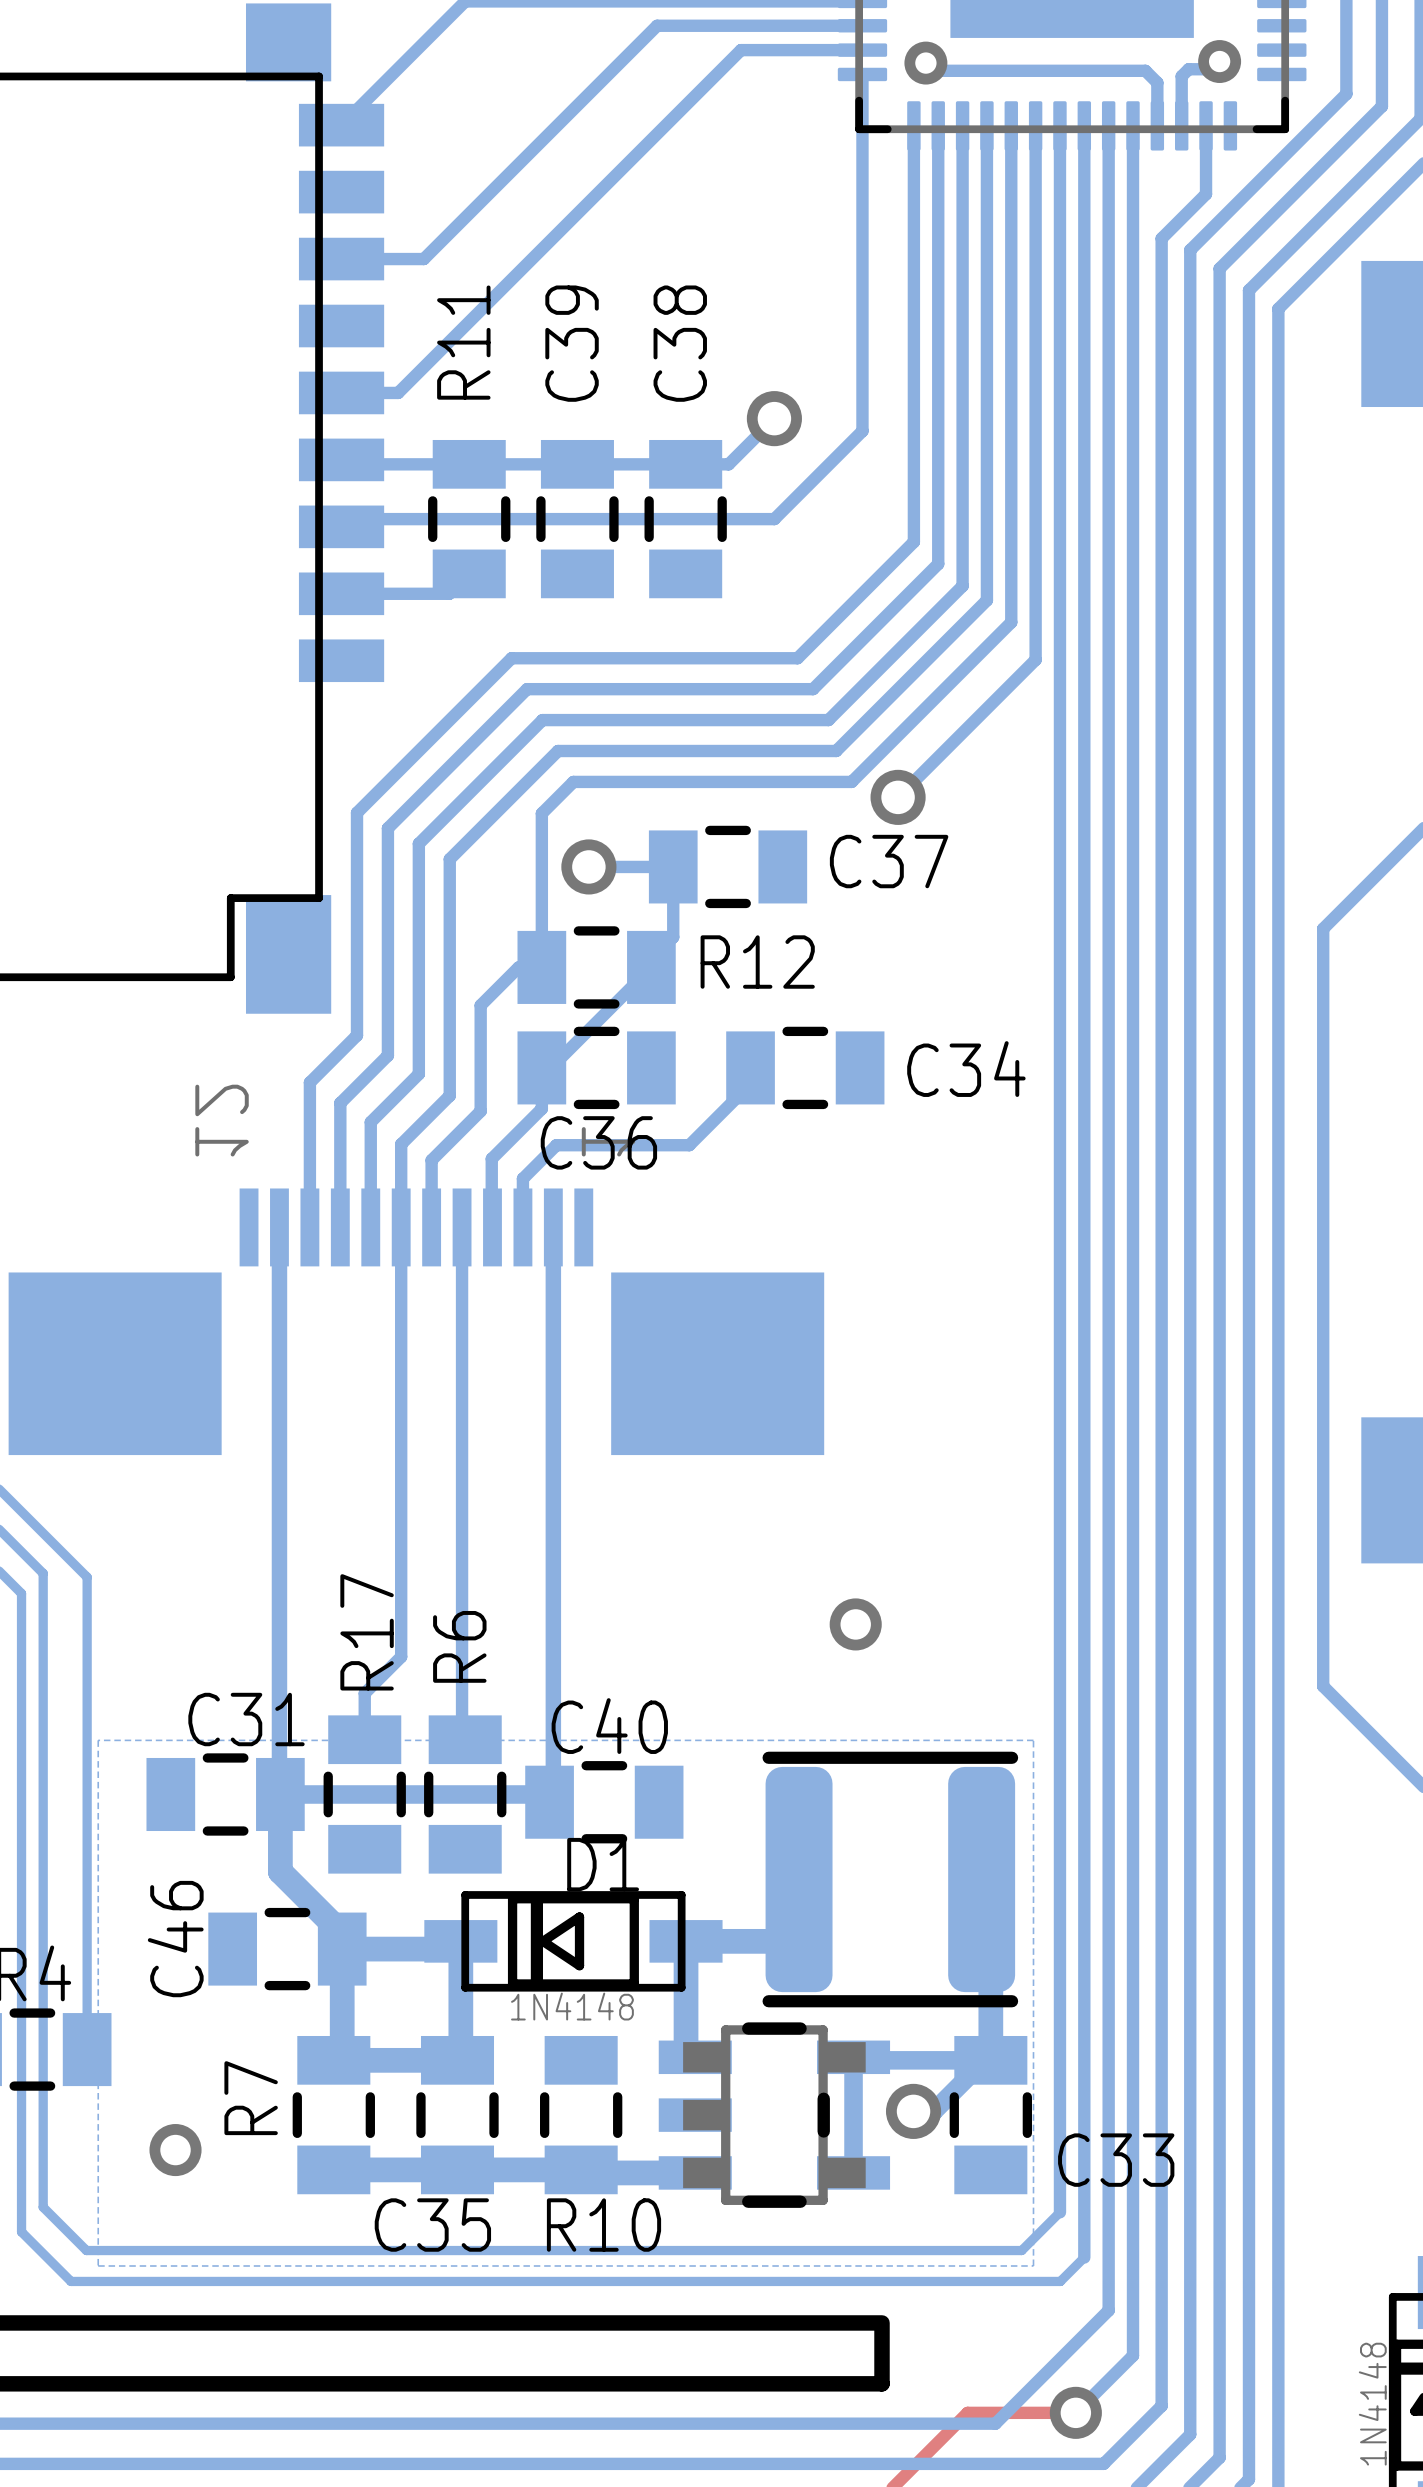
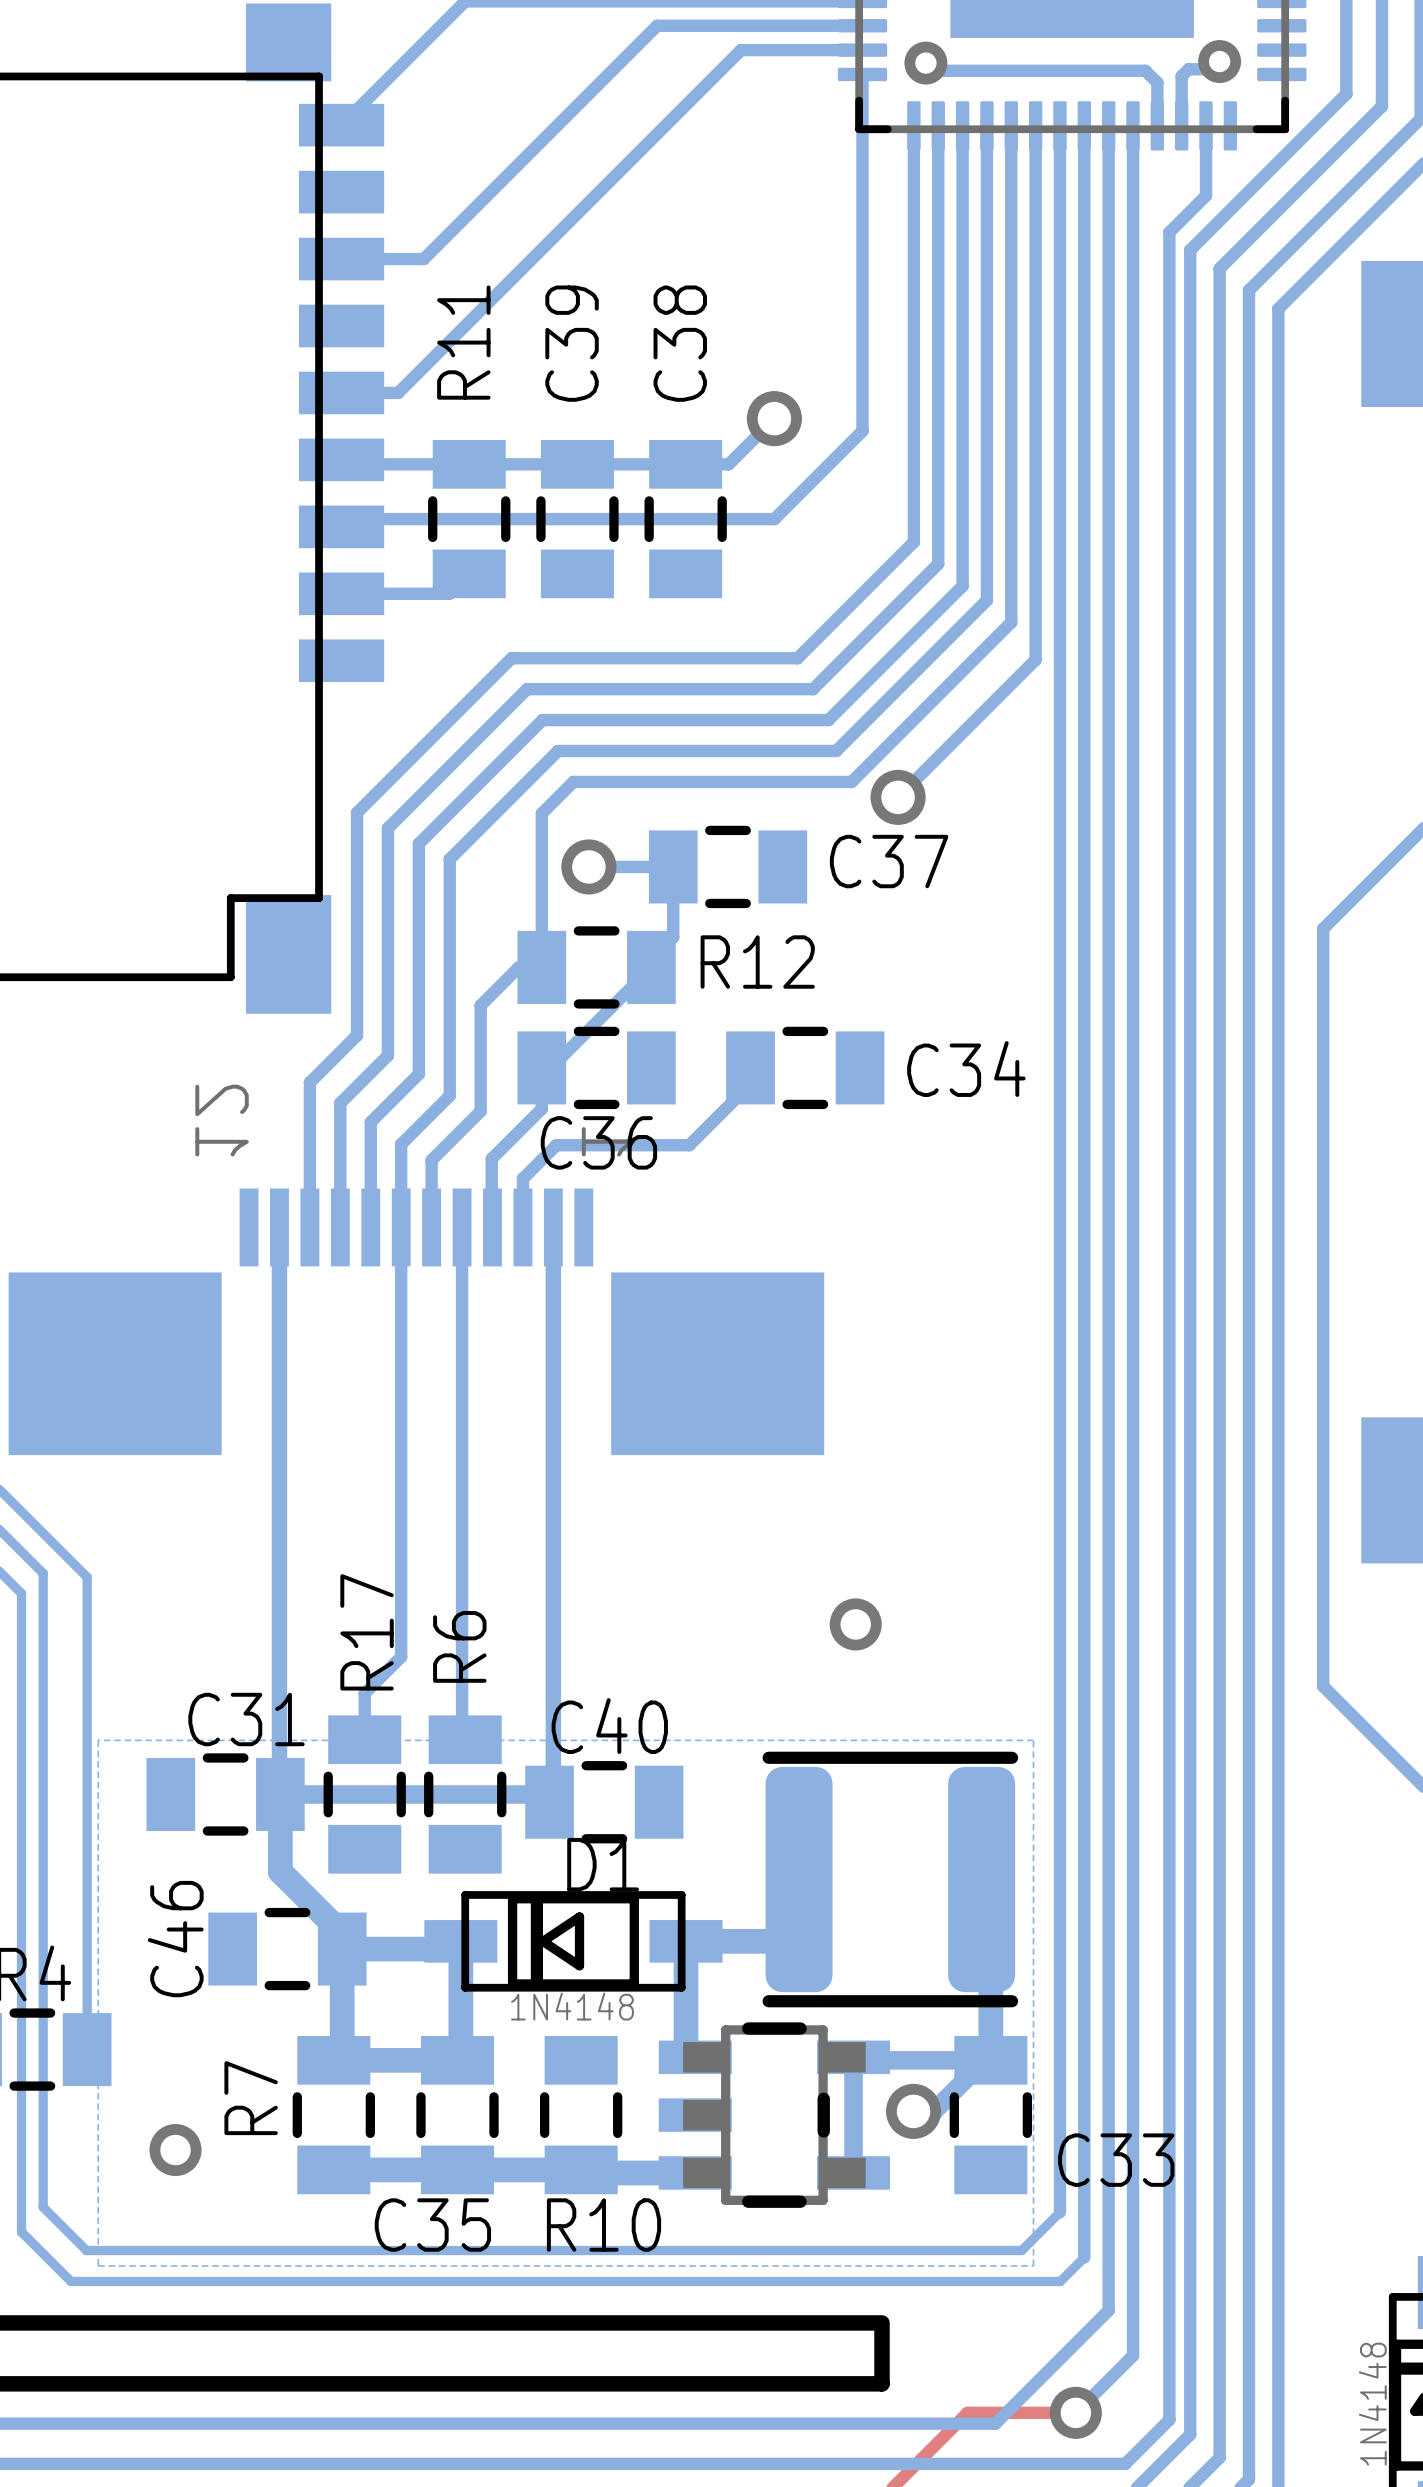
bottom track: (1206, 194) (1161, 238) (1161, 2405) (1103, 2463) -> (1206, 194) (1169, 232) (1169, 2419) (1125, 2463) (1103, 2463)

